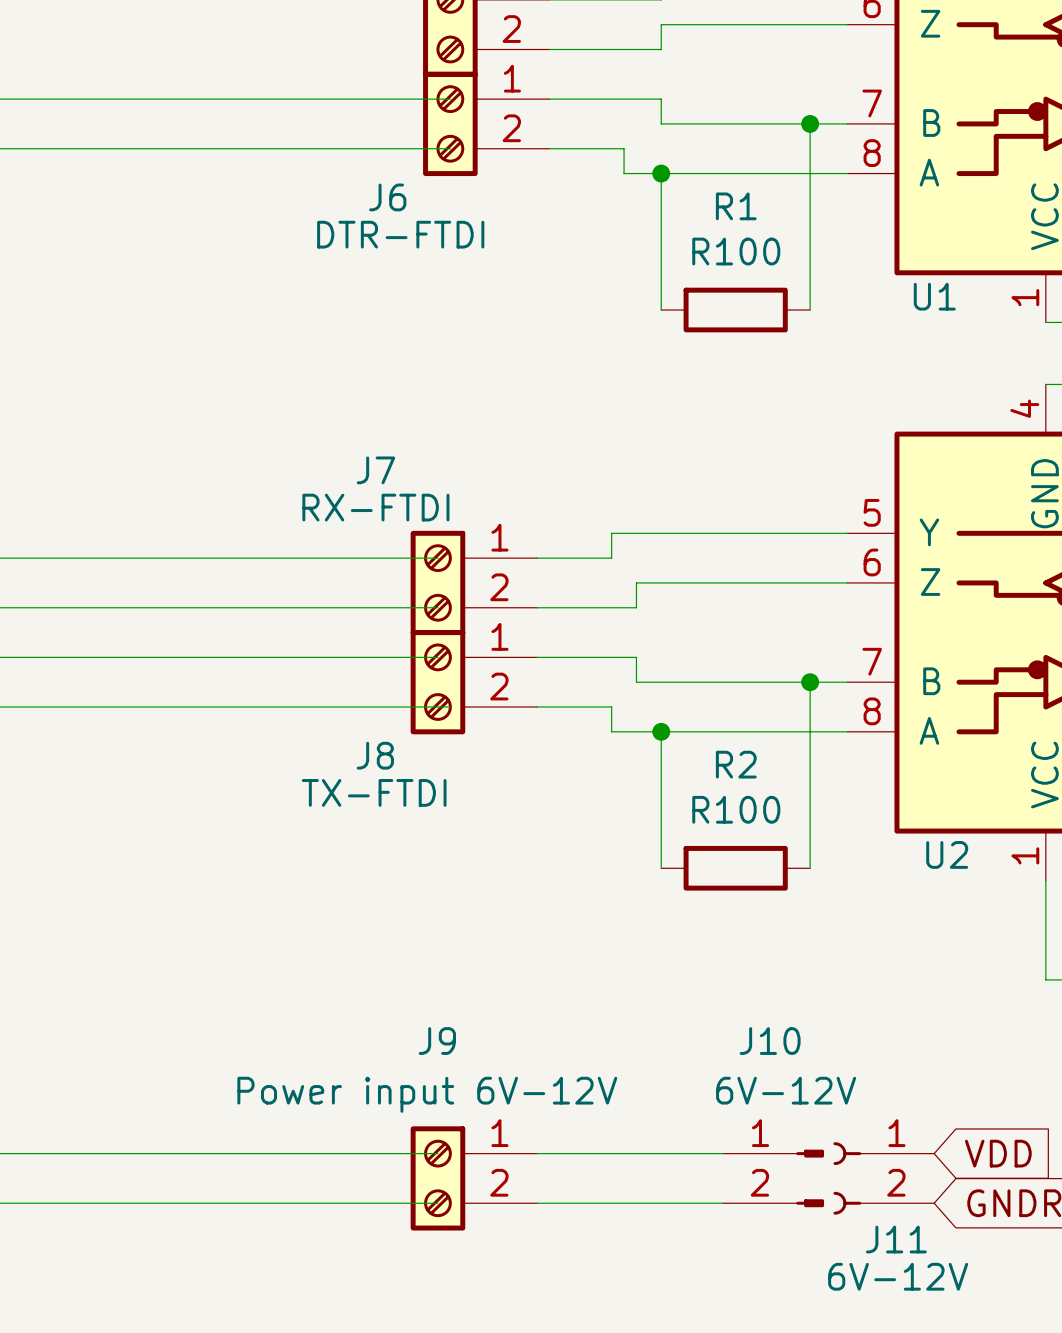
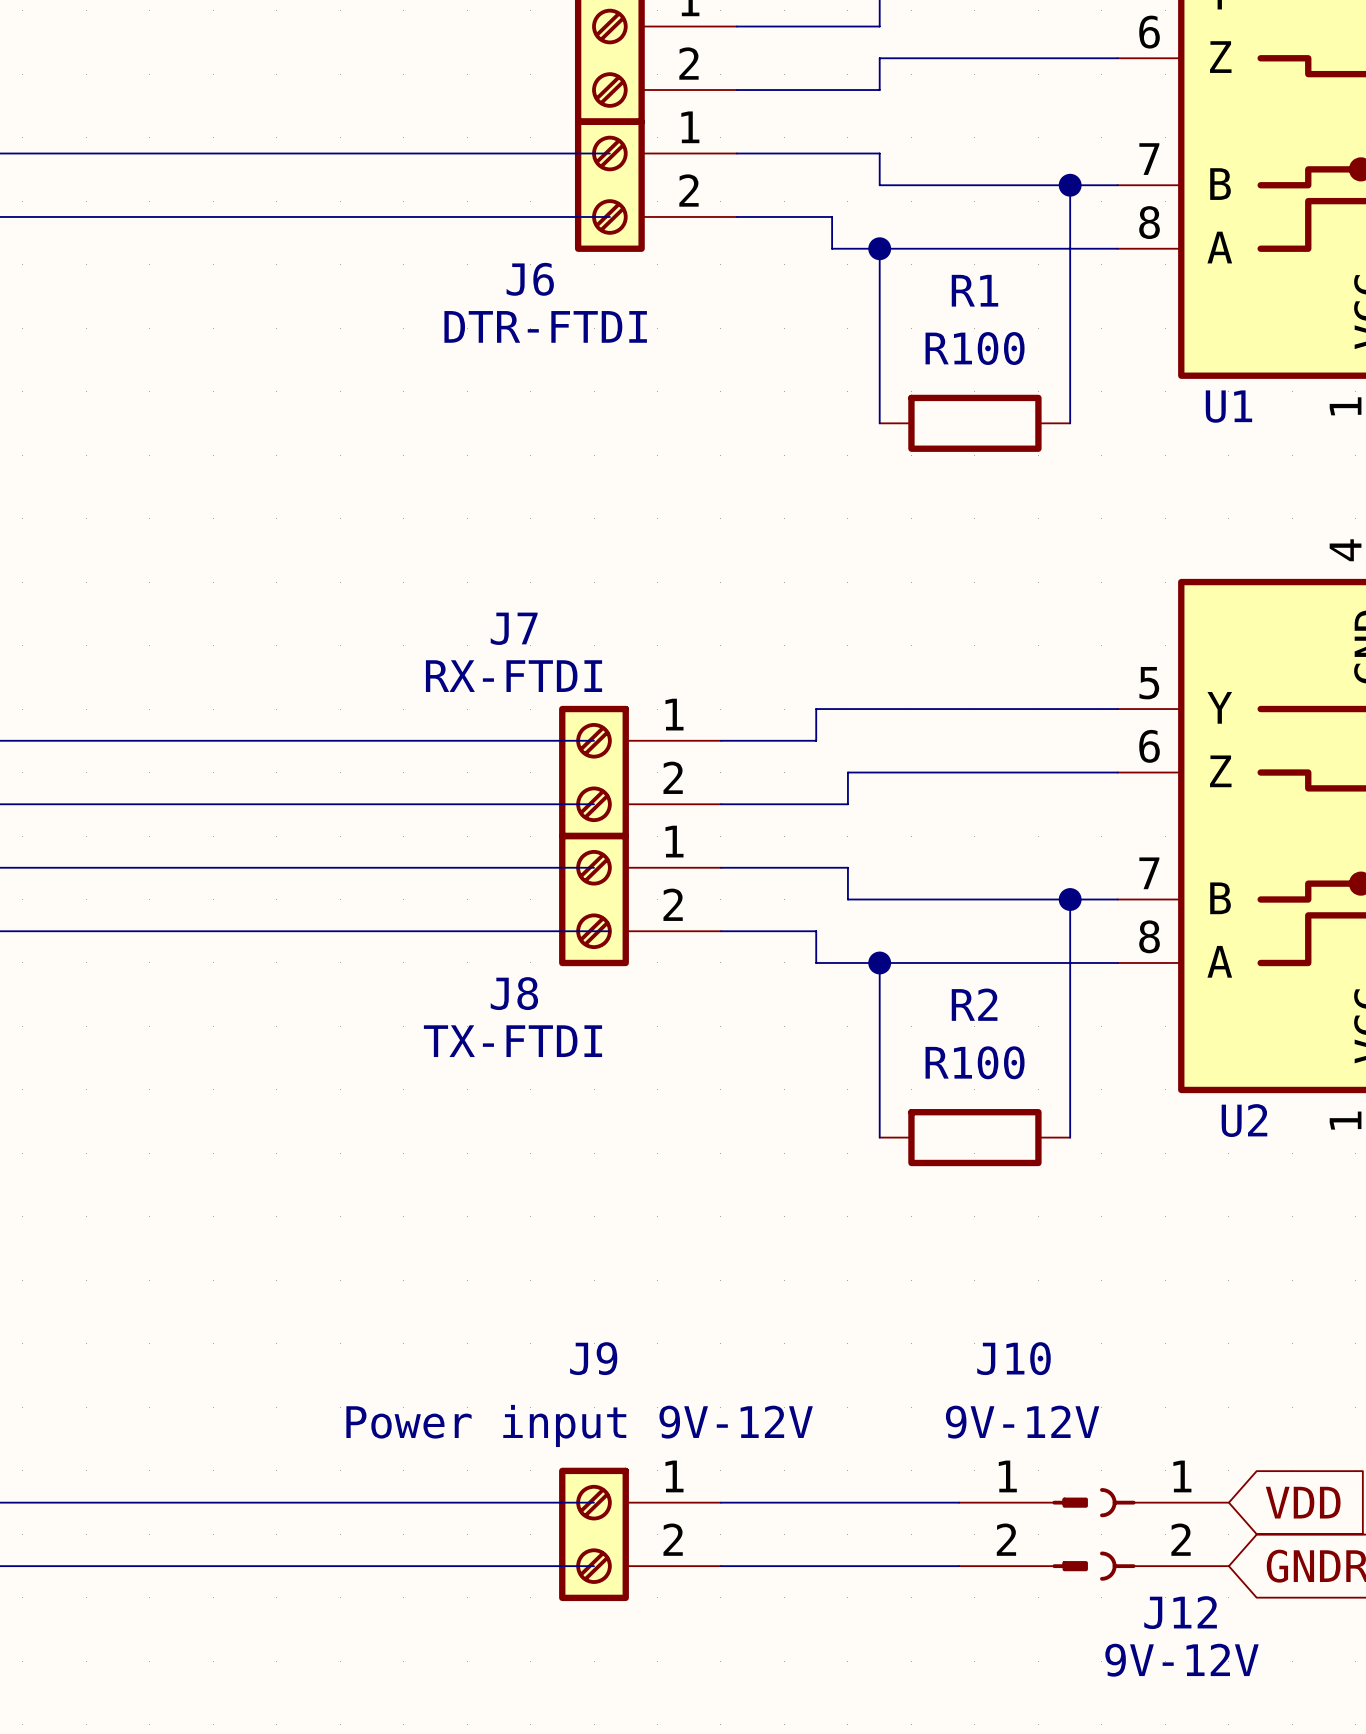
J10 value: 6V-12V (786, 1090) -> 9V-12V (1022, 1422)
J9 value: Power input 6V-12V (427, 1094) -> Power input 9V-12V (579, 1425)
J11 name: J11 (896, 1239) -> J12 (1180, 1612)
J11 value: 6V-12V (898, 1276) -> 9V-12V (1182, 1660)

